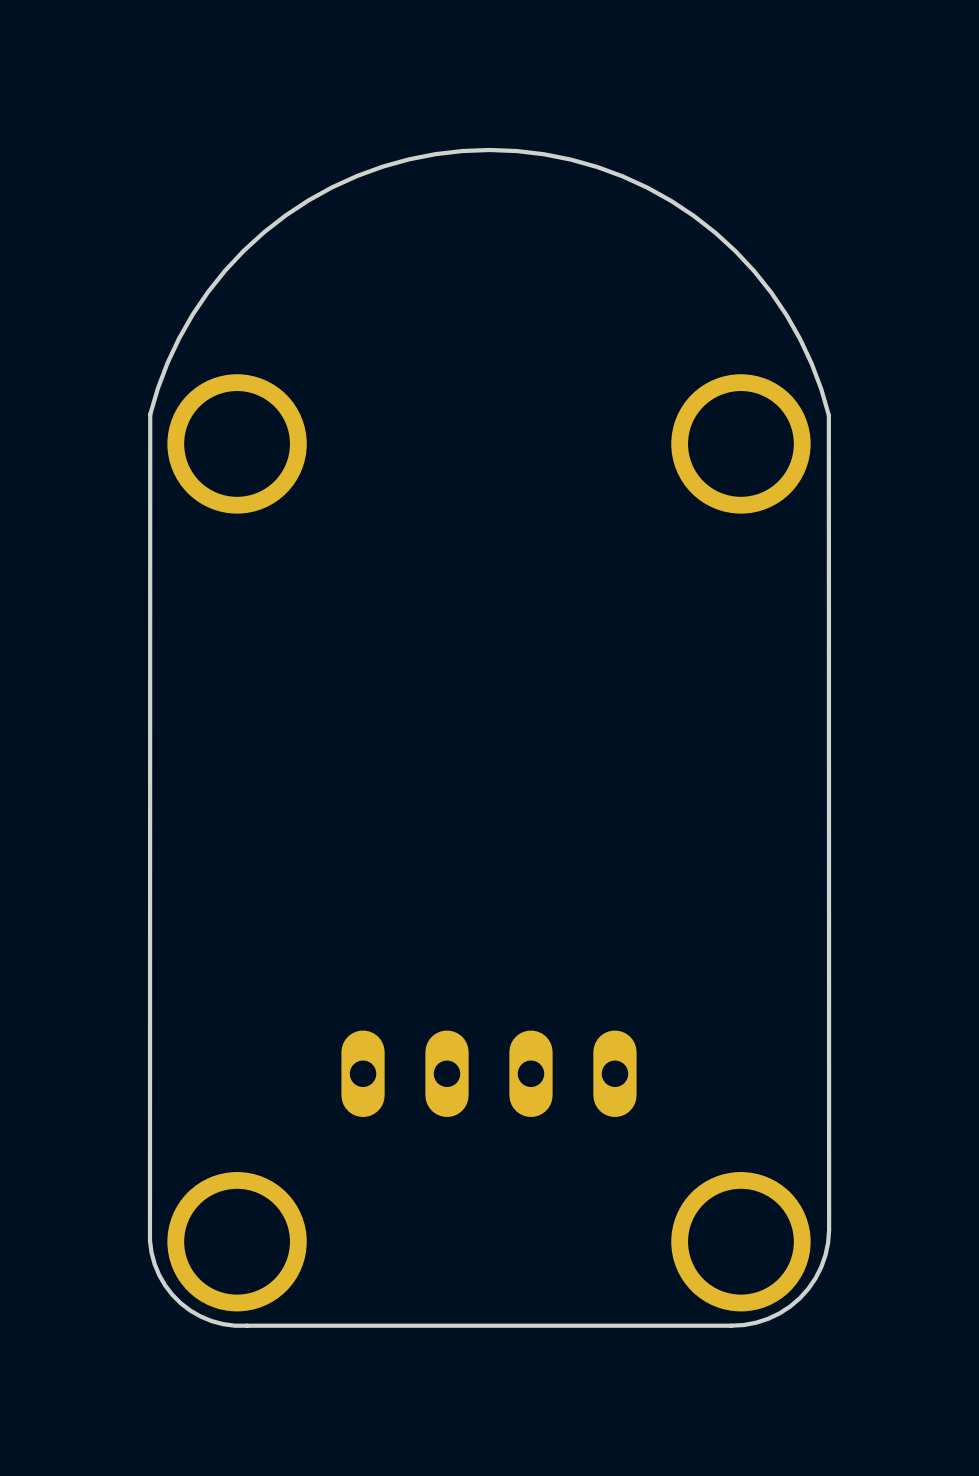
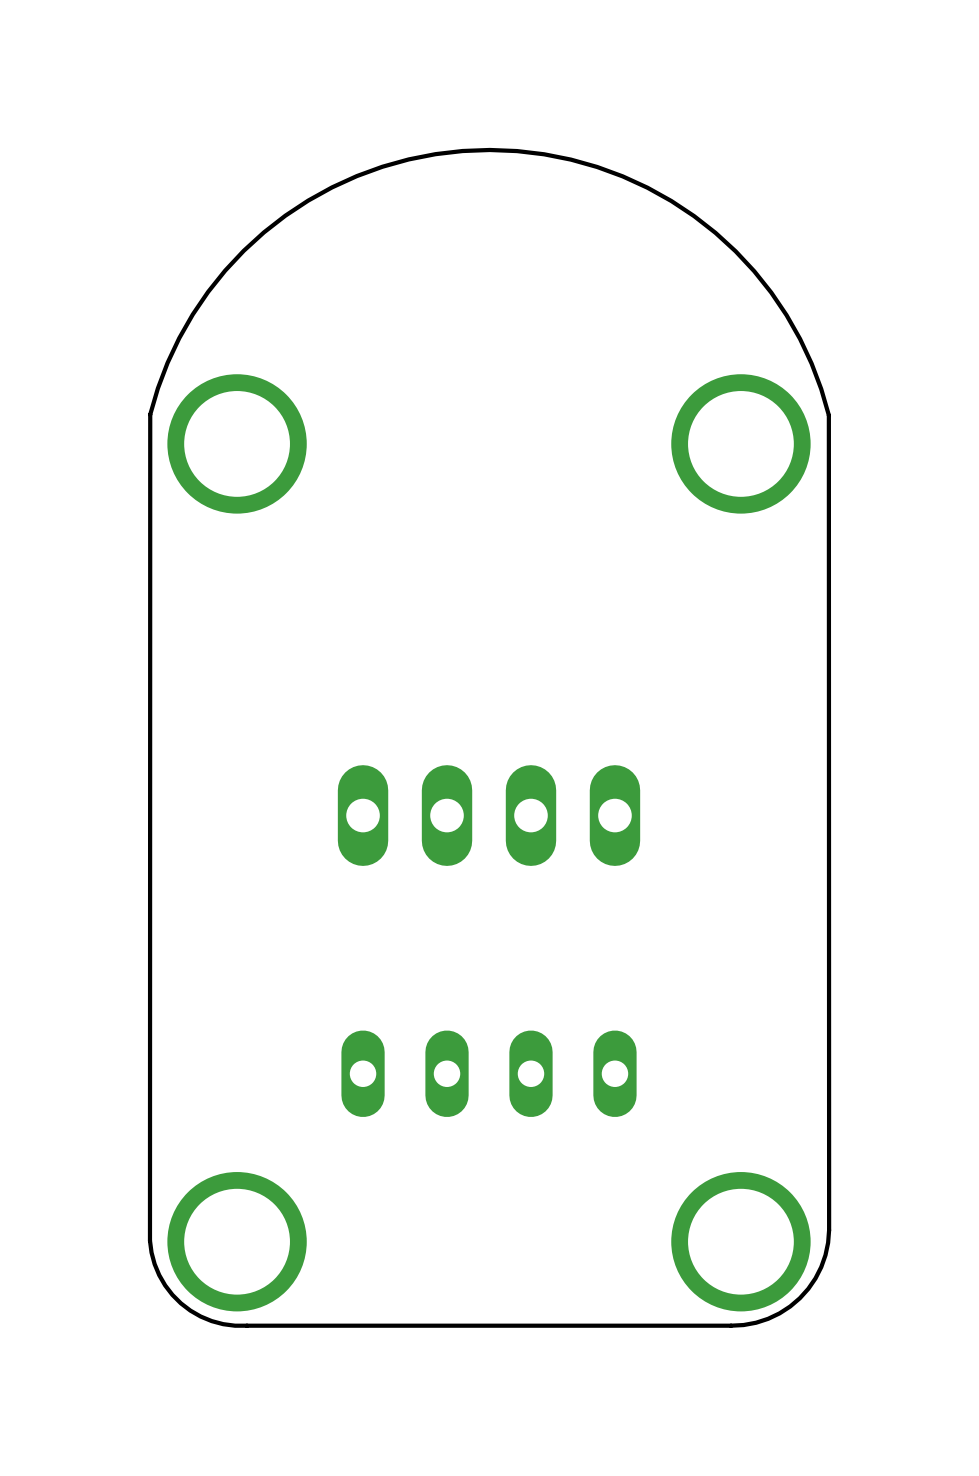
part: none -> (489, 815)

